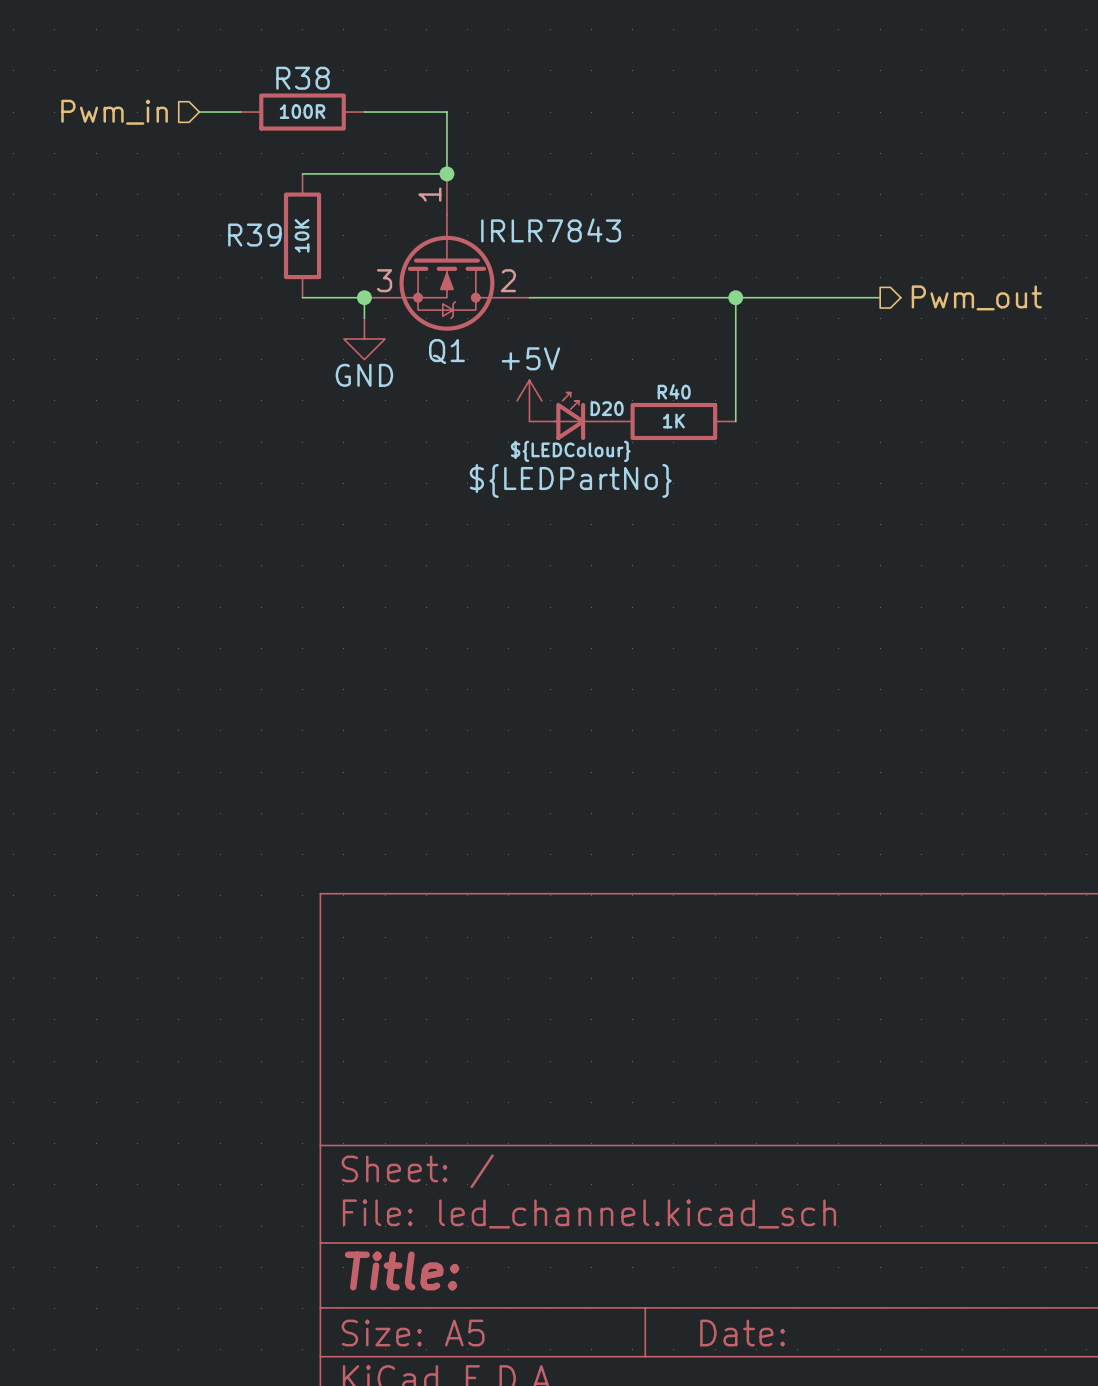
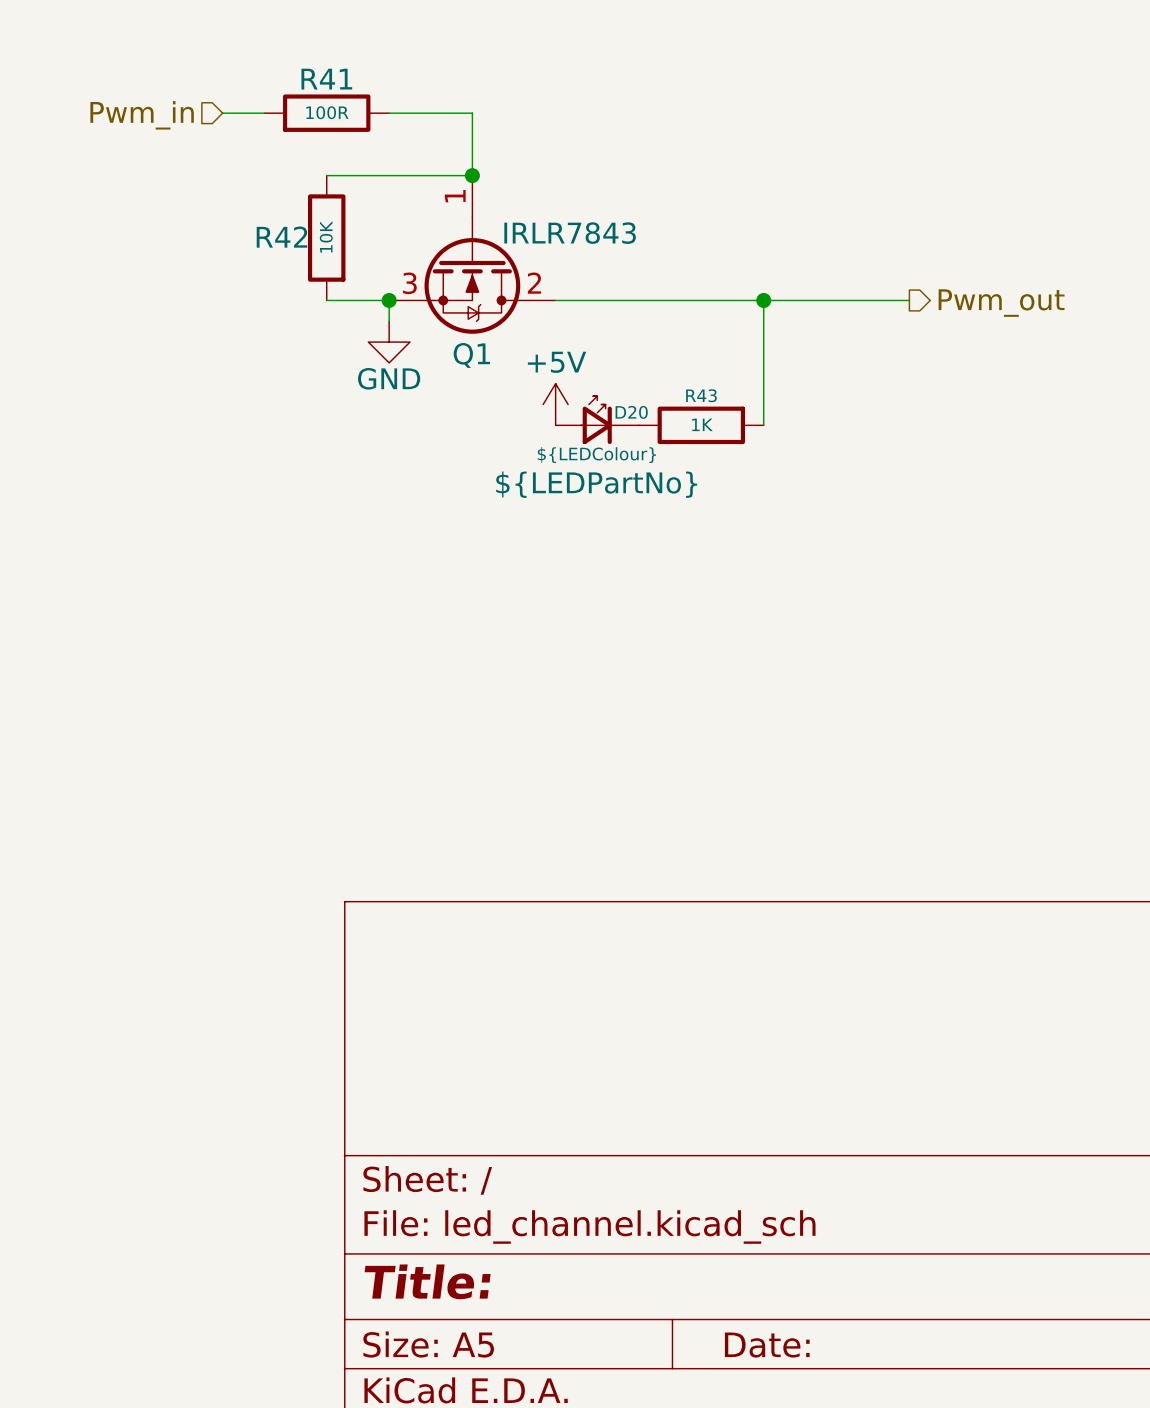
R38 name: R38 (303, 78) -> R41 (326, 79)
R39 name: R39 (254, 235) -> R42 (281, 237)
R40 name: R40 (674, 391) -> R43 (701, 395)

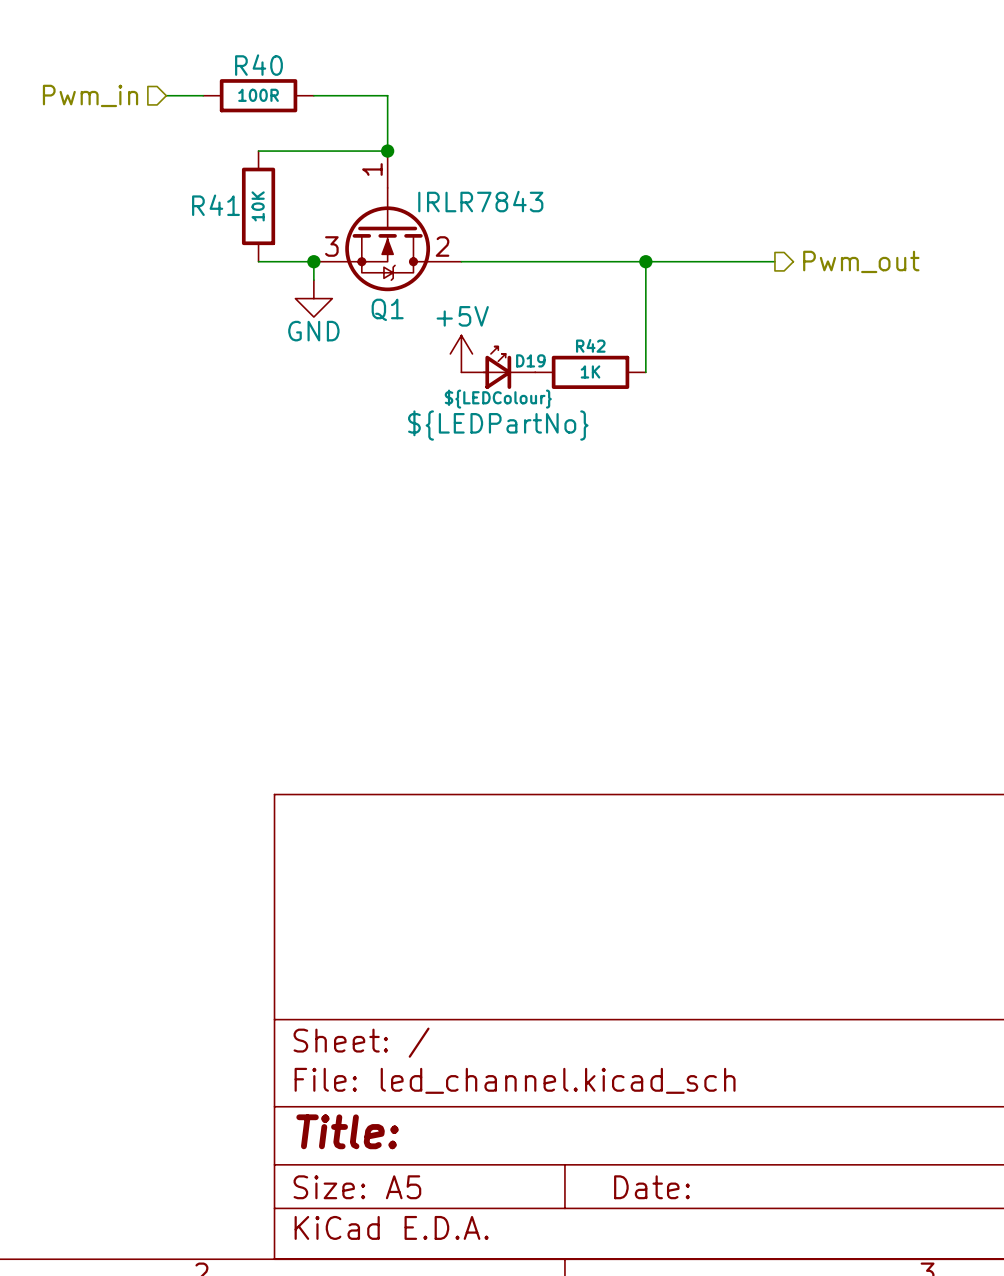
R41 name: R41 (326, 79) -> R40 (258, 65)
R42 name: R42 (281, 237) -> R41 (215, 205)
R43 name: R43 (701, 395) -> R42 (590, 345)
D20 name: D20 (631, 412) -> D19 (530, 360)

